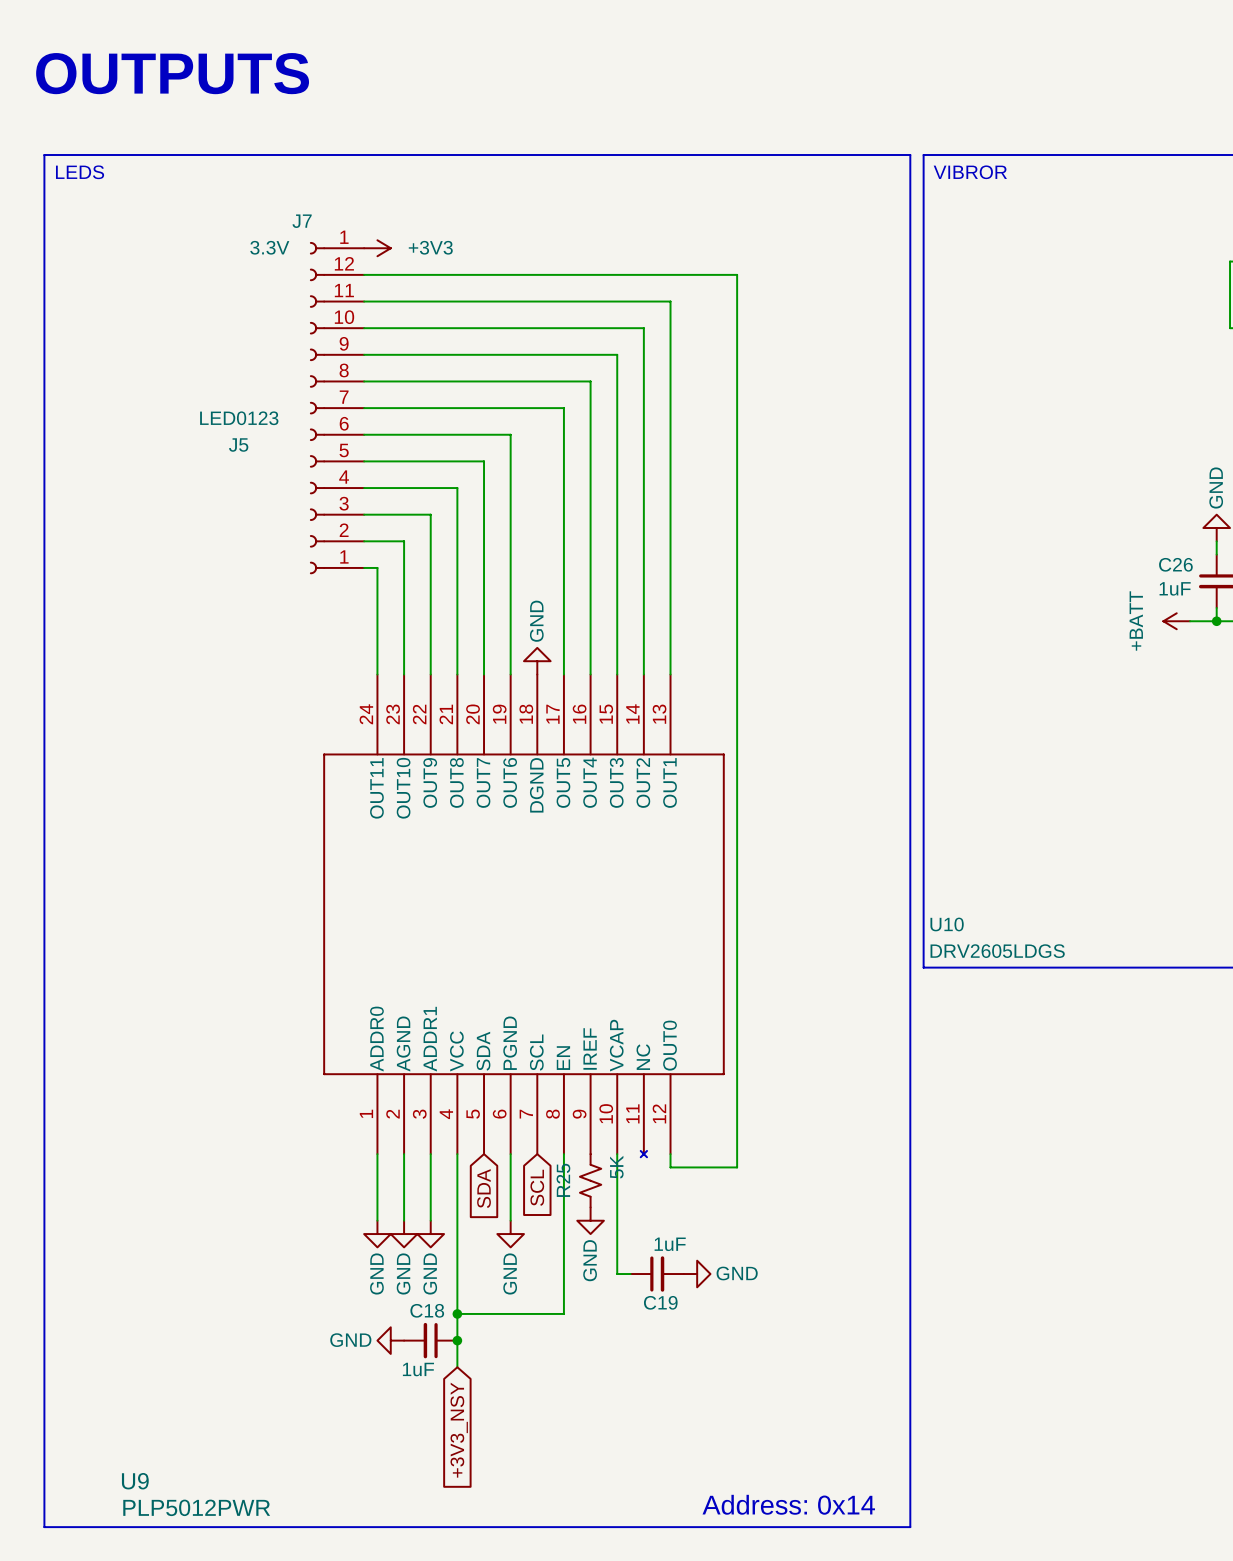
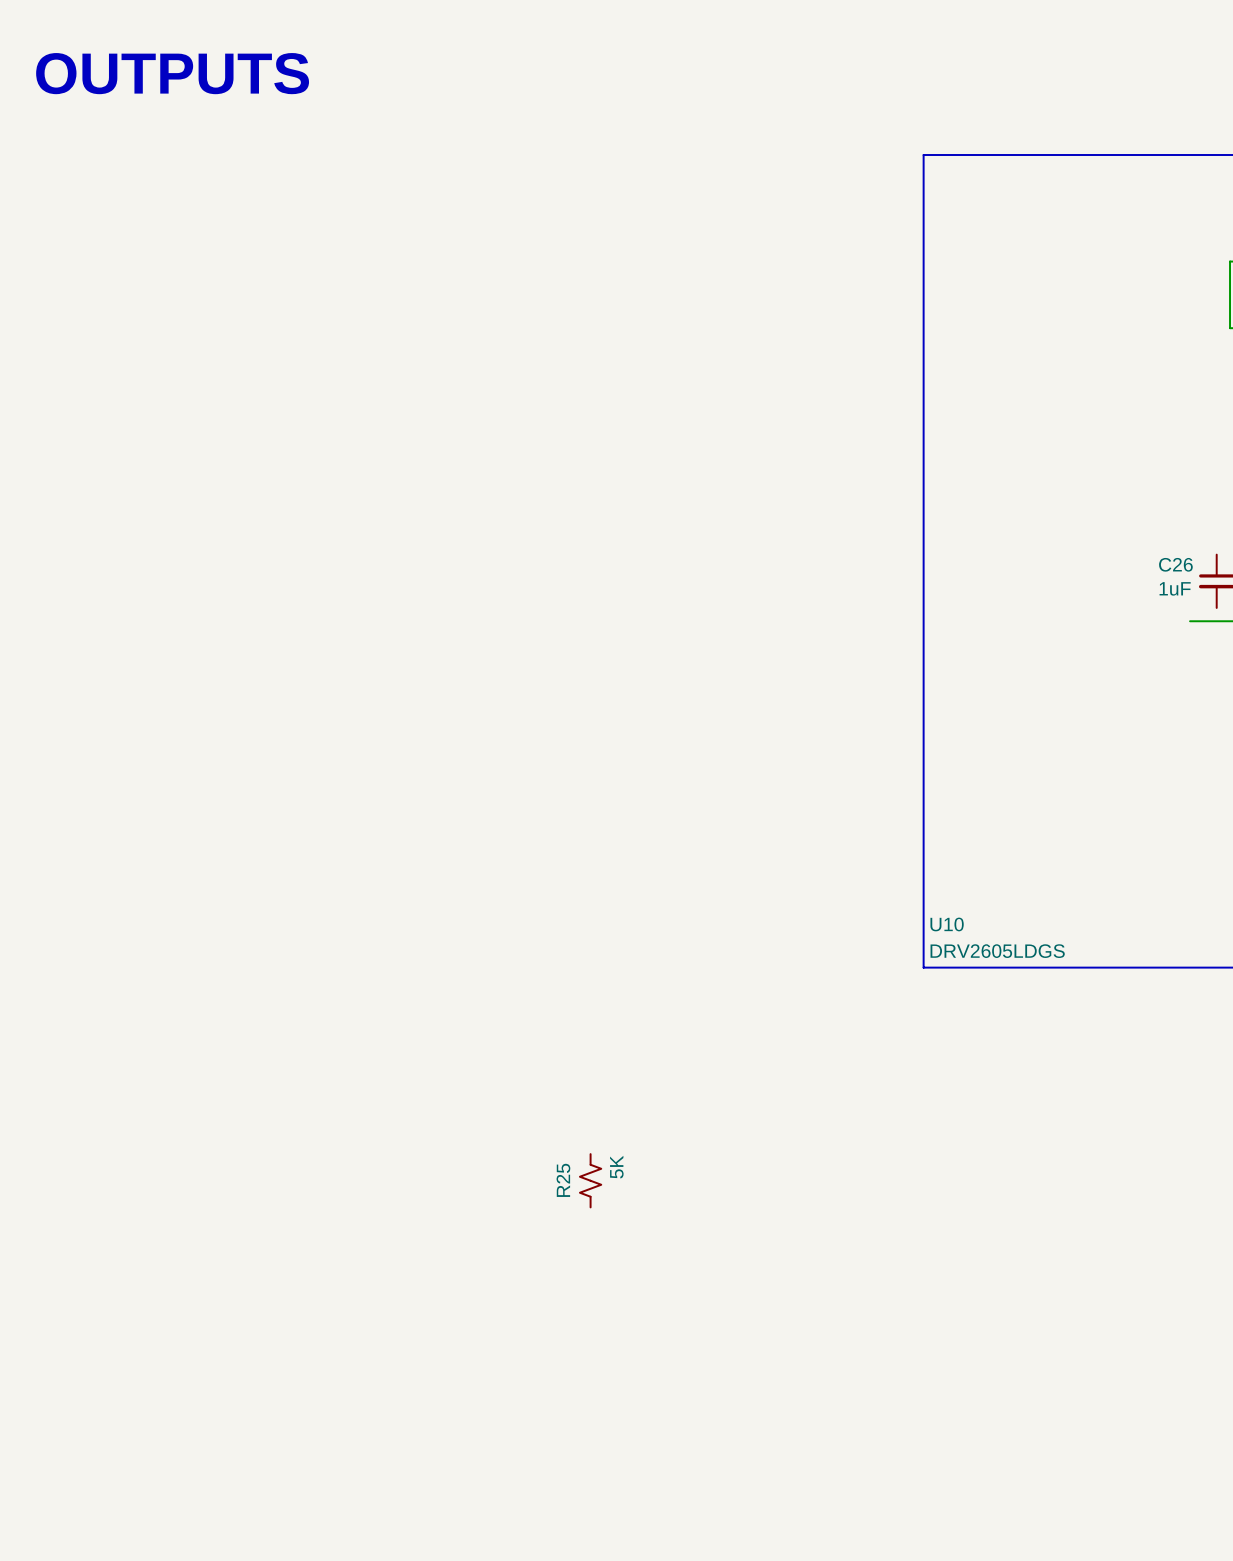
line: (44, 155) (910, 155) (910, 1527) (44, 1527) (44, 155) -> none
text: LEDS (80, 172) -> none
text: VIBROR (970, 172) -> none
J7: 3.3V (337, 248) -> none
power symbol: +3V3 (377, 248) -> none
wire: (364, 274) (737, 274) (737, 1167) (670, 1167) (670, 1154) -> none
wire: (364, 301) (670, 301) (670, 674) -> none
wire: (364, 328) (643, 328) (643, 674) -> none
wire: (364, 354) (617, 354) (617, 674) -> none
wire: (364, 381) (590, 381) (590, 674) -> none
wire: (364, 408) (563, 408) (563, 674) -> none
J5: LED0123 (337, 421) -> none
wire: (364, 434) (510, 434) (510, 674) -> none
wire: (364, 461) (484, 461) (484, 674) -> none
wire: (364, 488) (457, 488) (457, 674) -> none
wire: (364, 514) (430, 514) (430, 674) -> none
power symbol: GND (1216, 528) -> none
wire: (364, 541) (404, 541) (404, 674) -> none
wire: (1216, 541) (1216, 554) -> none
wire: (364, 567) (377, 567) (377, 674) -> none
wire: (1216, 607) (1216, 621) -> none
power symbol: +BATT (1176, 621) -> none
junction: (1216, 621) -> none
power symbol: GND (537, 661) -> none
U9: PLP5012PWR (523, 915) -> none
wire: (377, 1154) (377, 1220) -> none
wire: (404, 1154) (404, 1220) -> none
wire: (430, 1154) (430, 1220) -> none
wire: (457, 1154) (457, 1367) -> none
wire: (510, 1154) (510, 1220) -> none
wire: (563, 1154) (563, 1313) (457, 1313) -> none
wire: (617, 1154) (617, 1274) (630, 1274) -> none
global label: SCL (537, 1187) -> none
global label: SDA (484, 1188) -> none
power symbol: GND (590, 1220) -> none
power symbol: GND (377, 1234) -> none
power symbol: GND (404, 1234) -> none
power symbol: GND (430, 1234) -> none
power symbol: GND (510, 1234) -> none
C19: 1uF (657, 1274) -> none
power symbol: GND (697, 1274) -> none
junction: (457, 1313) -> none
power symbol: GND (390, 1340) -> none
C18: 1uF (430, 1340) -> none
junction: (457, 1340) -> none
global label: +3V3_NSY (459, 1430) -> none
text: Address: 0x14 (788, 1504) -> none

